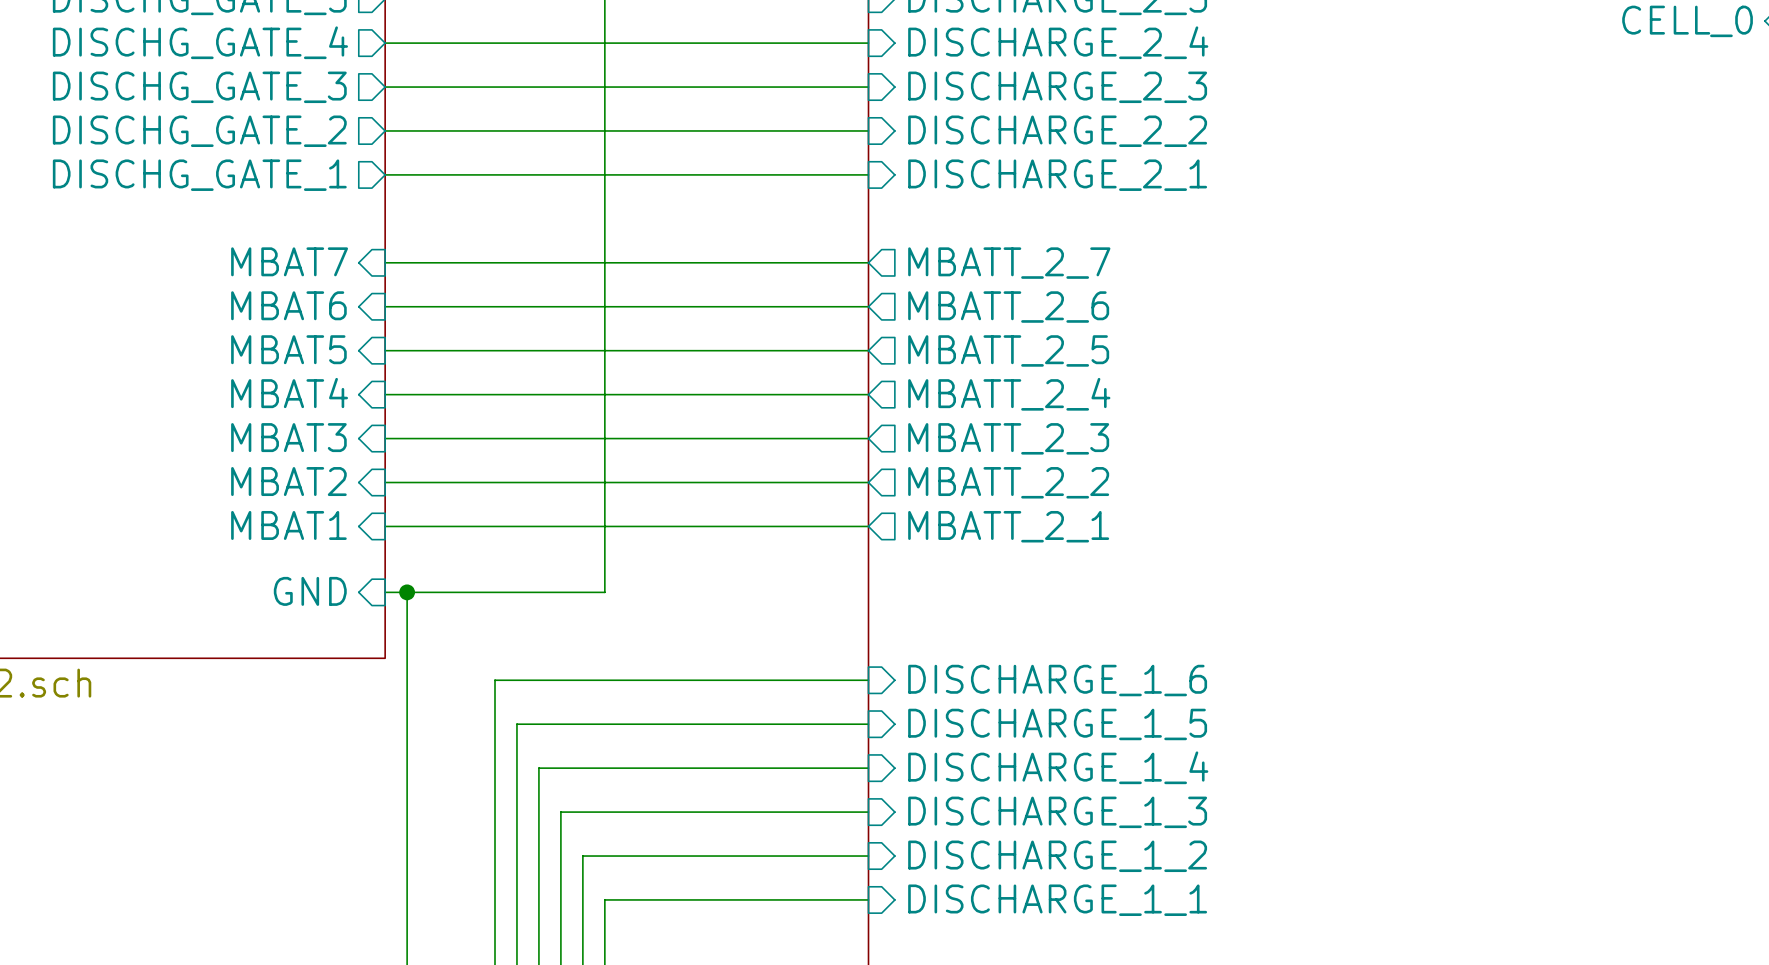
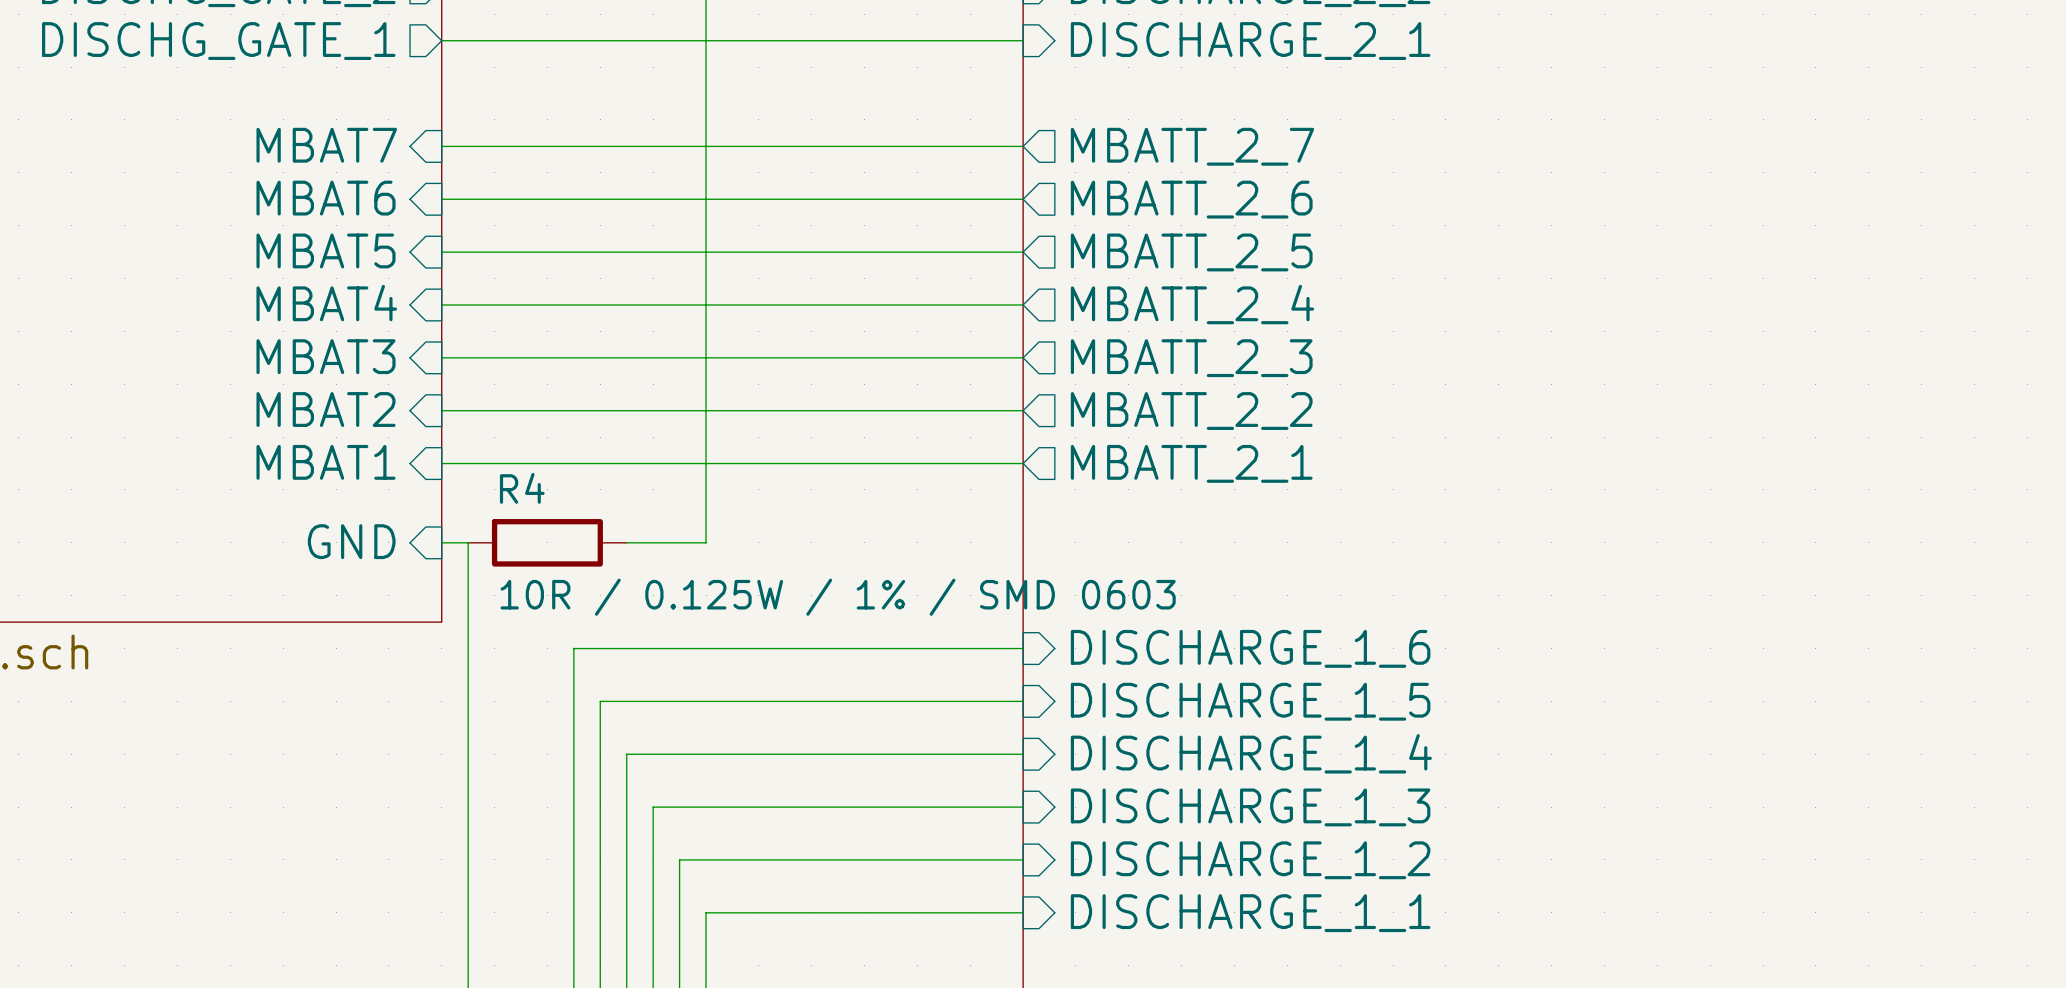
wire: (407, 592) (538, 592) -> none
junction: (407, 592) -> none
R4: none -> 10R / 0.125W / 1% / SMD 0603 (547, 542)

